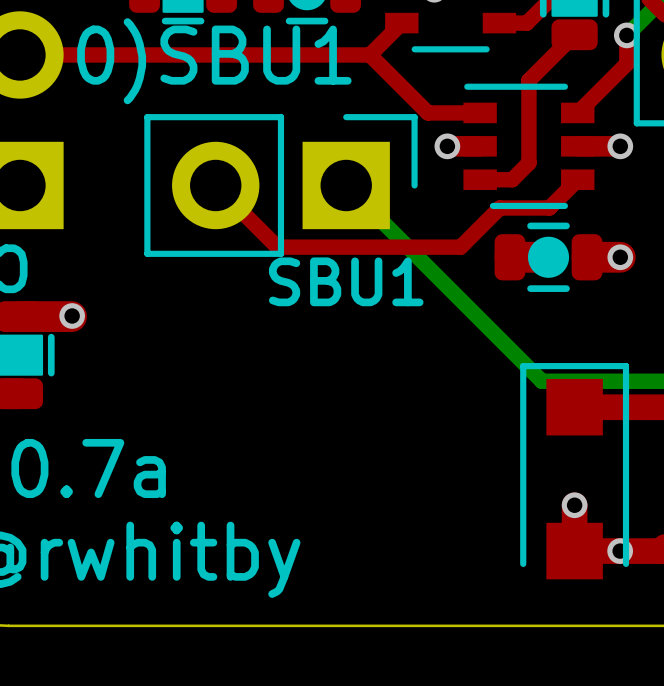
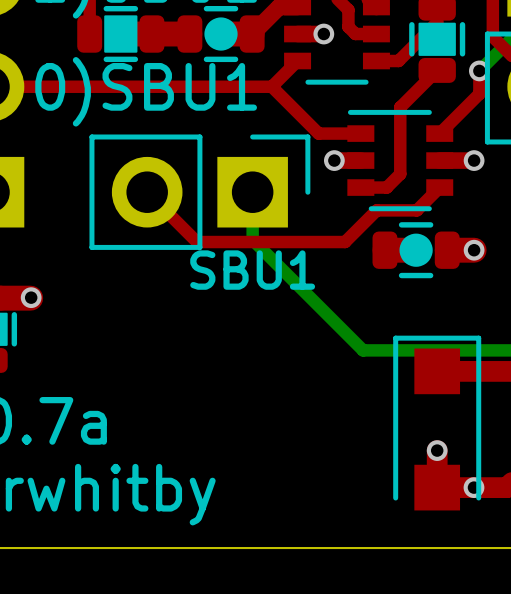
bottom track: (346, 185) (541, 381) -> (252, 192) (252, 239) (363, 350) (410, 350)

